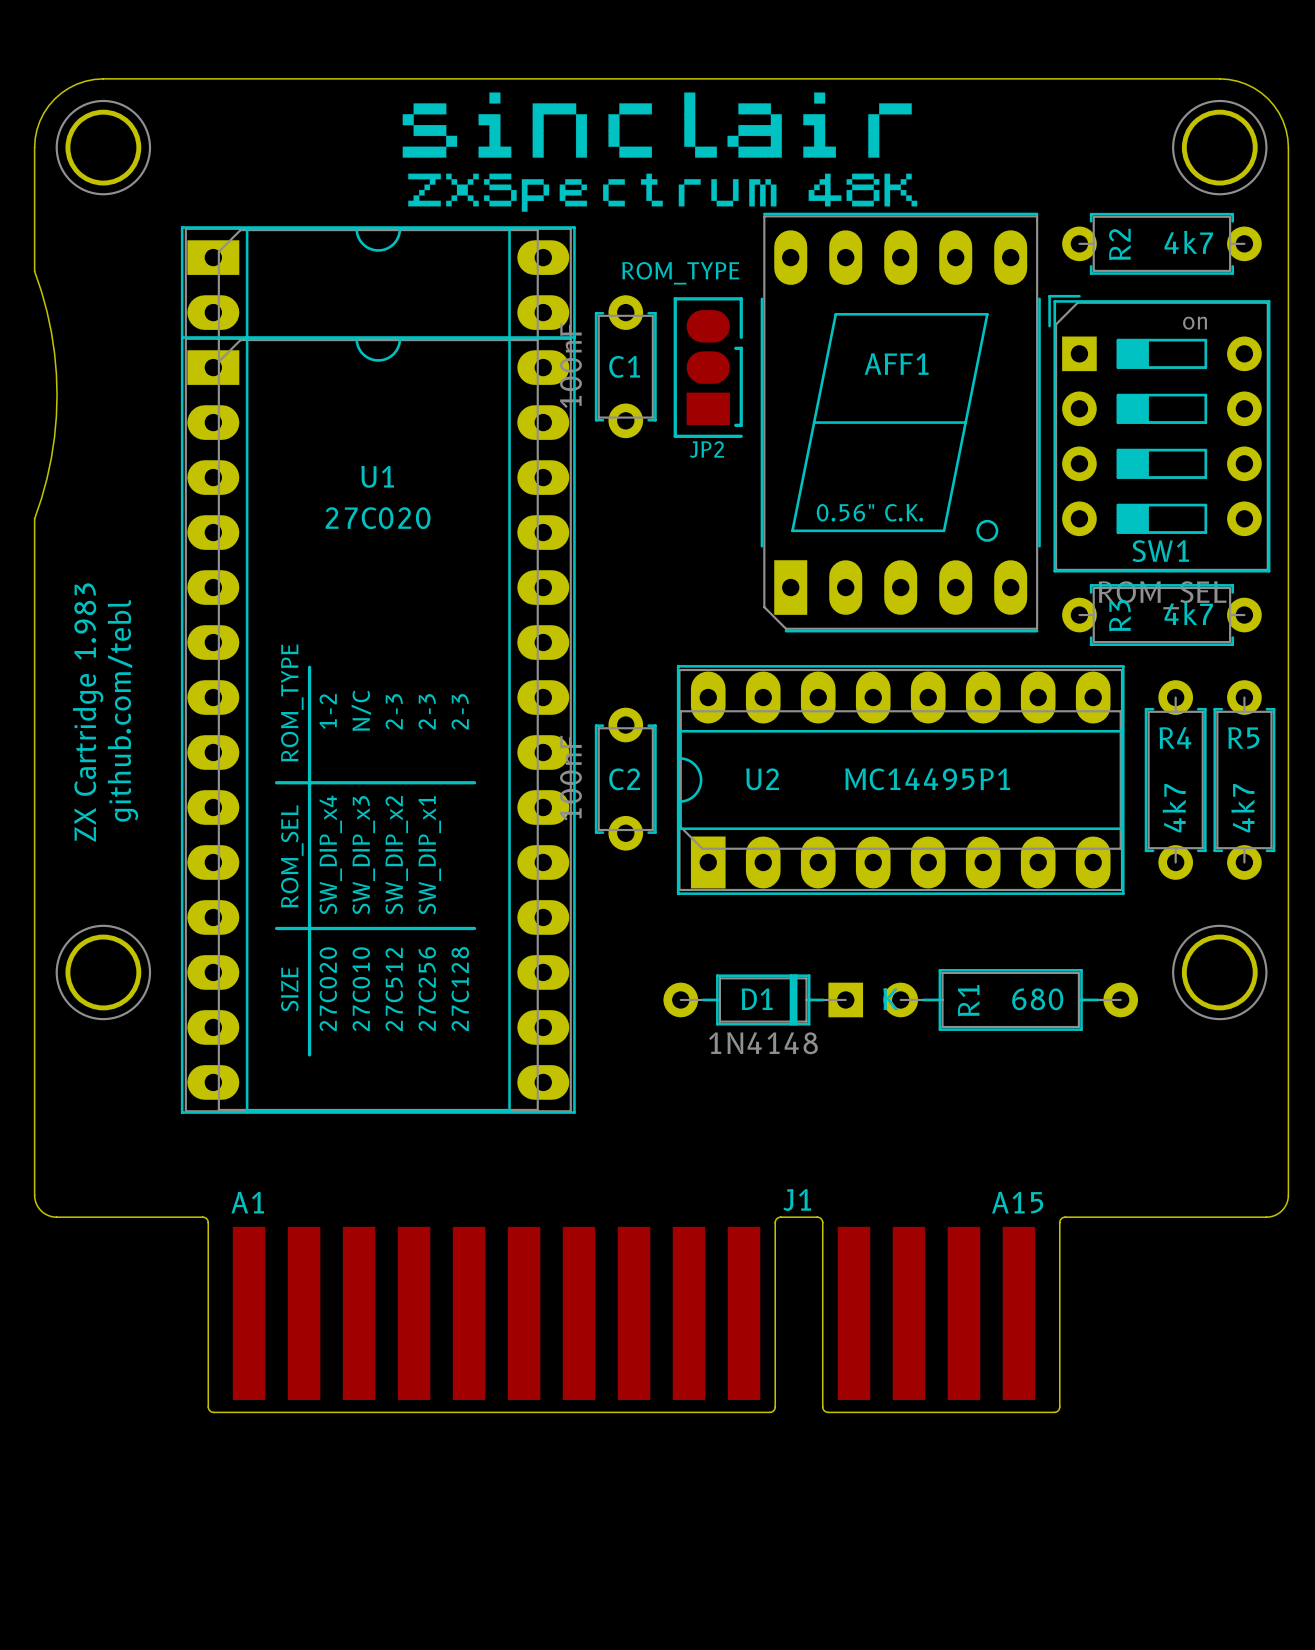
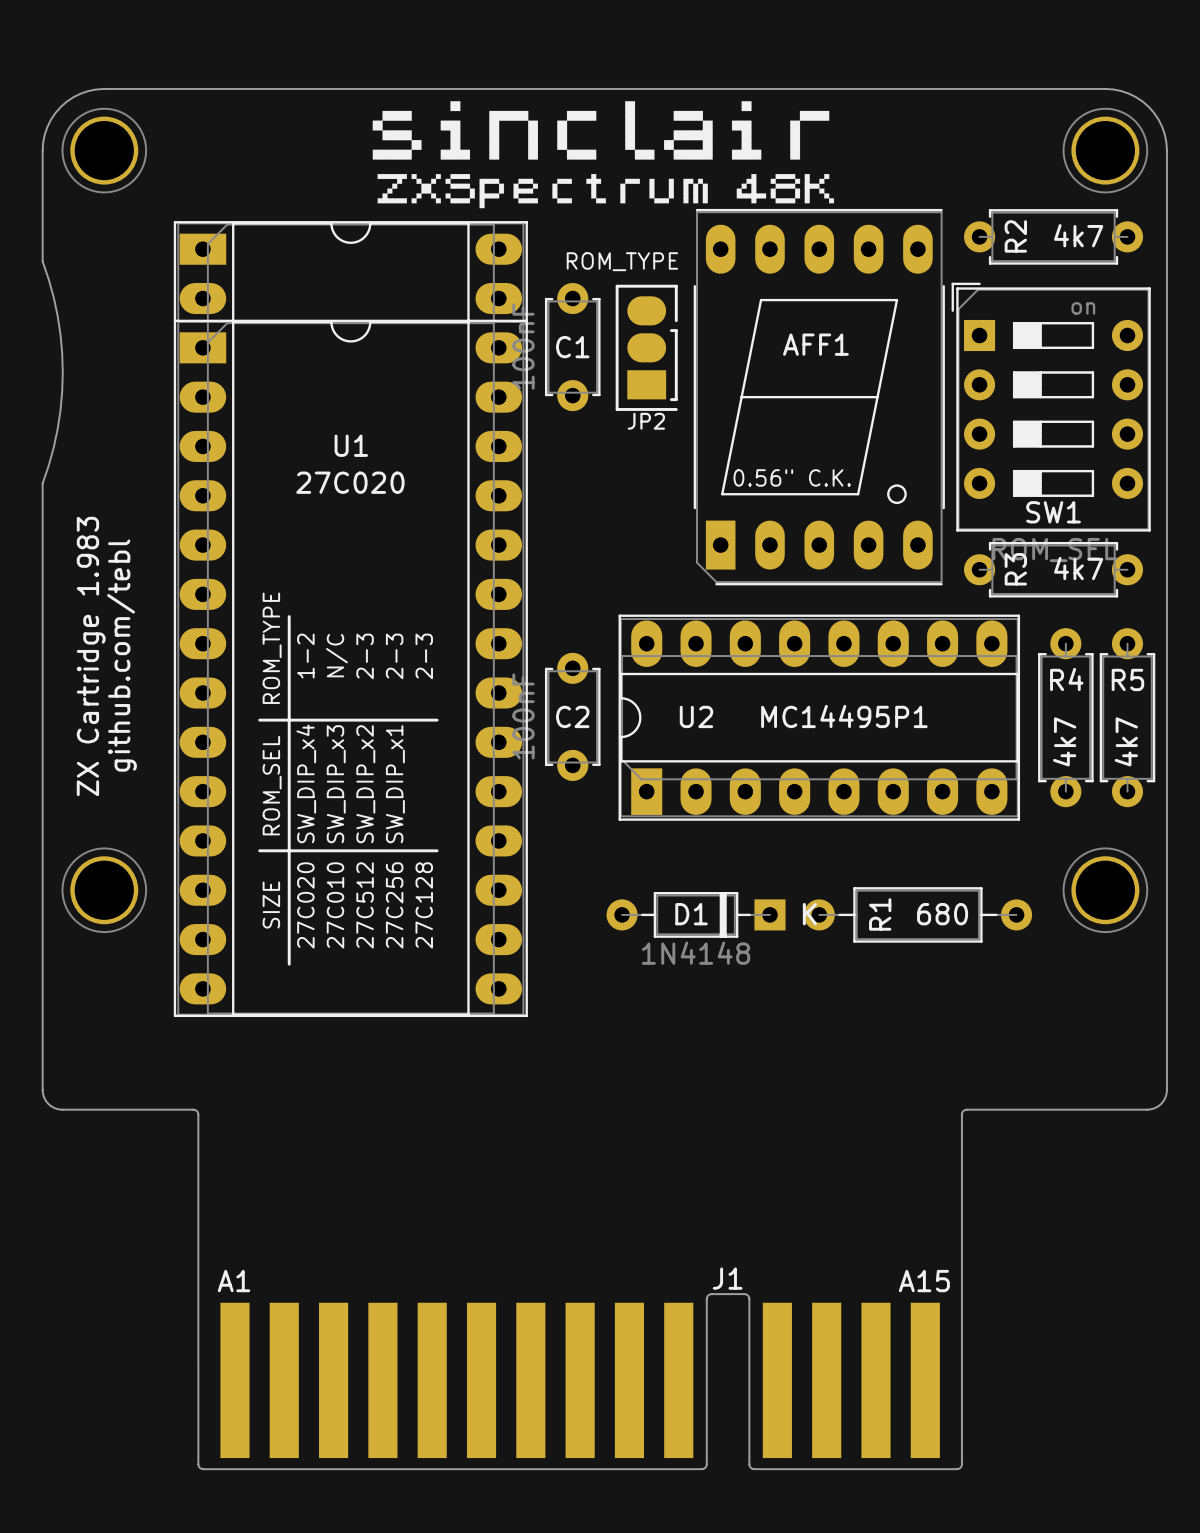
board edge: (208, 1222) (208, 1406) (212, 1412) (771, 1411) (775, 1406) (775, 1222) (776, 1218) (780, 1217) (817, 1217) (822, 1221) (822, 1406) (824, 1411) (1054, 1412) (1058, 1410) (1059, 1406) -> (198, 1114) (198, 1464) (202, 1469) (703, 1469) (706, 1464) (706, 1297) (711, 1294) (744, 1294) (749, 1299) (749, 1464) (751, 1468) (958, 1469) (961, 1464) (961, 1279)
J1 position: (634, 1313) -> (580, 1380)

